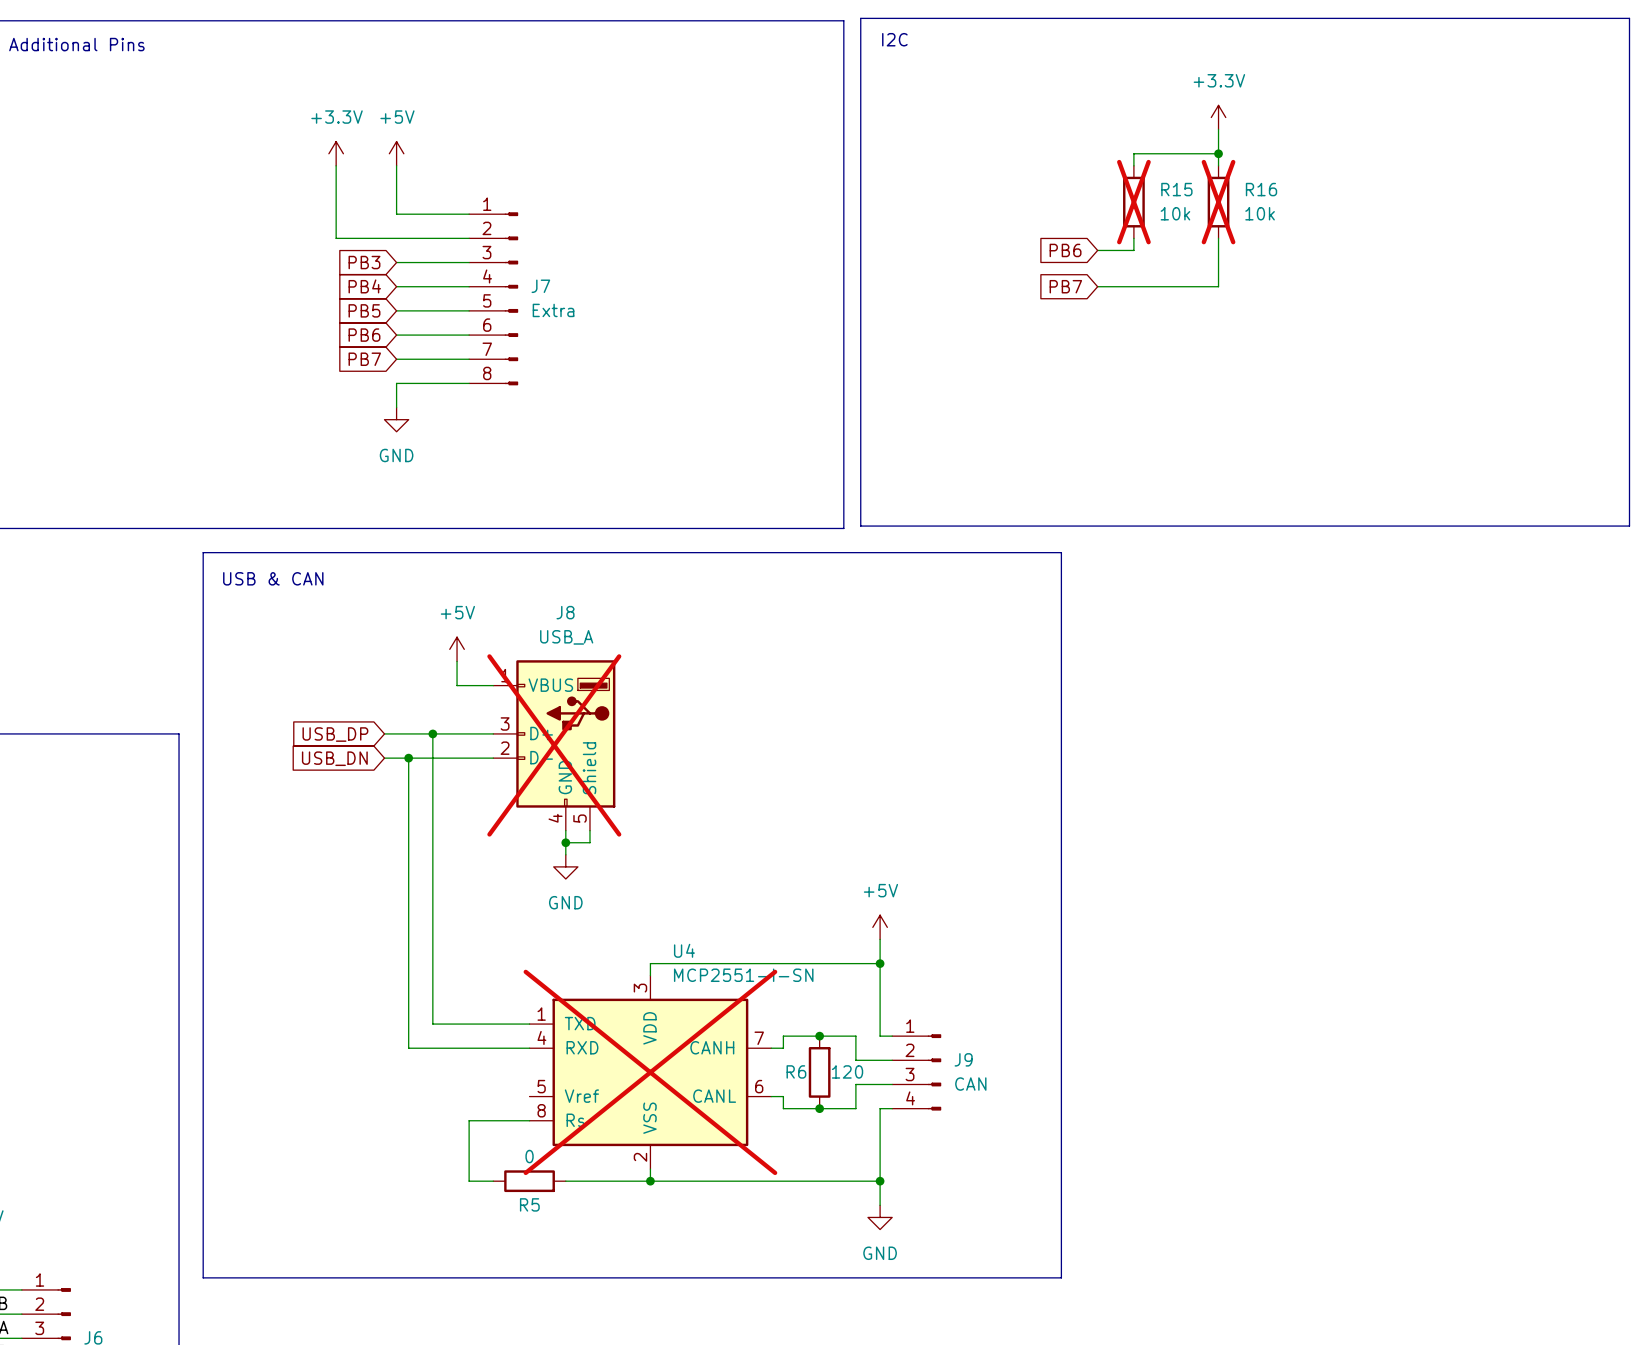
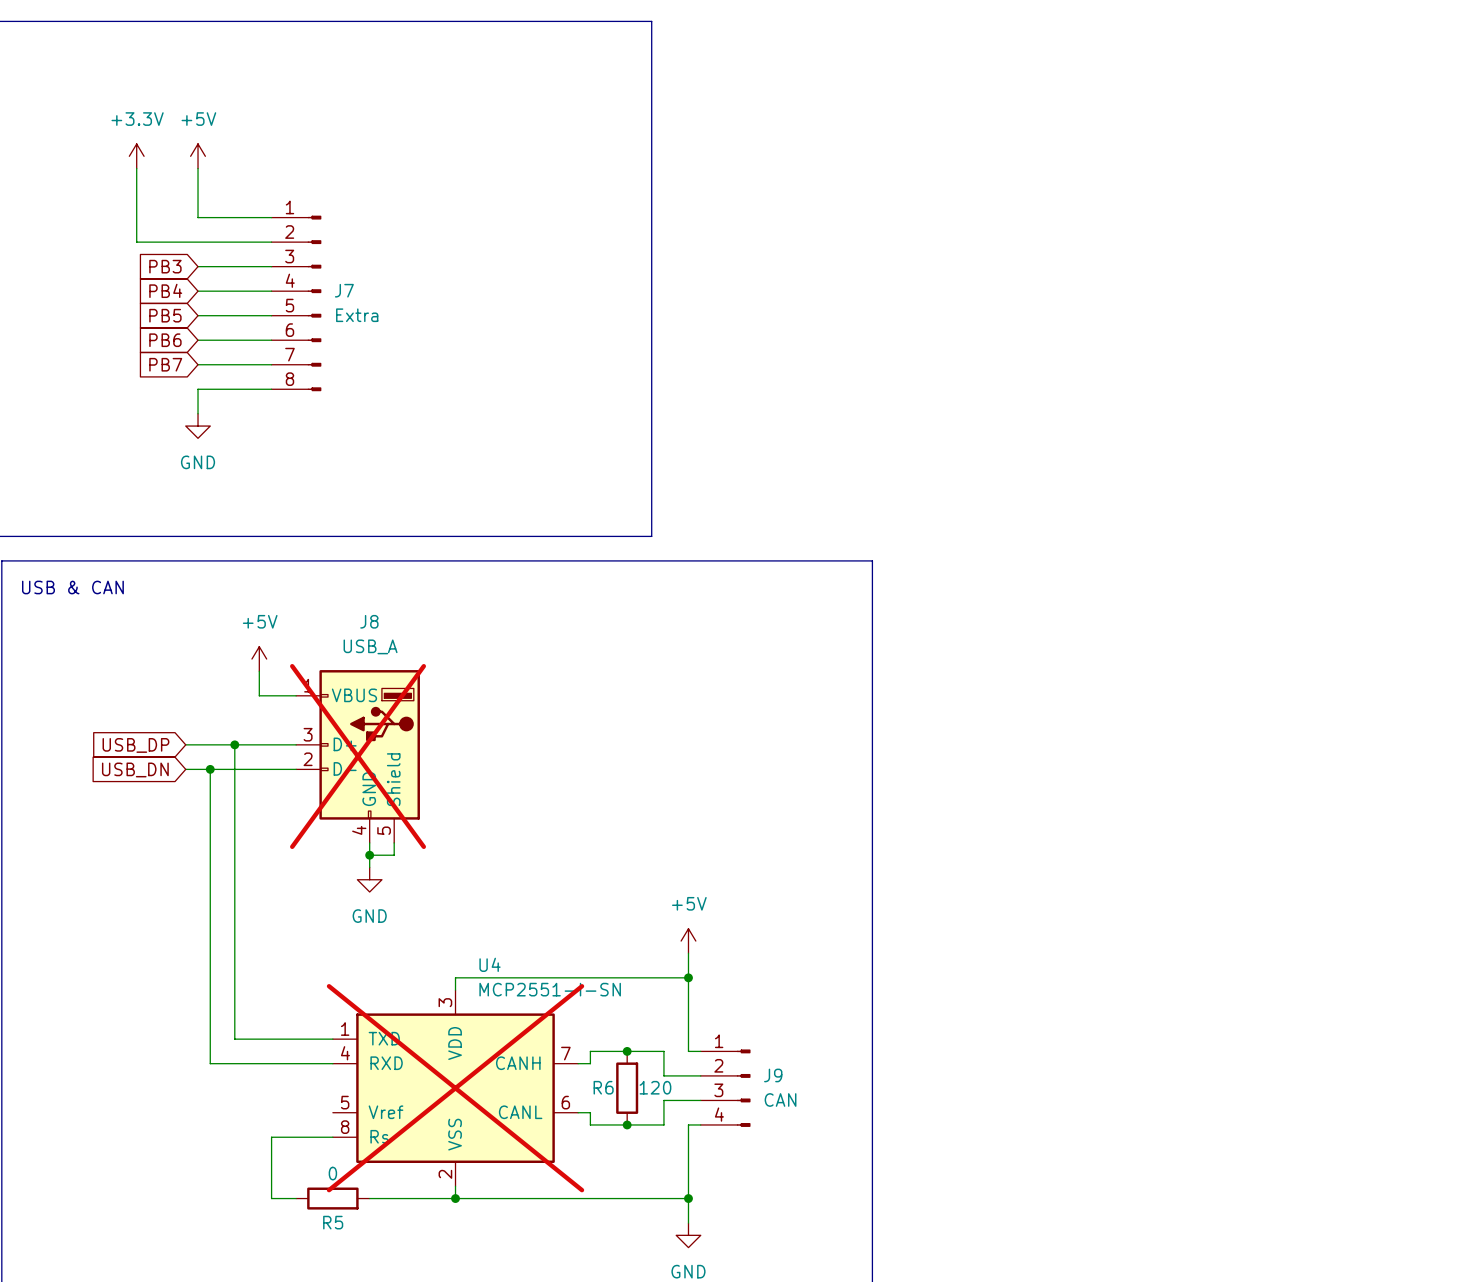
line: (860, 18) (1629, 18) (1629, 526) (860, 526) (860, 18) -> none
text: I2C (894, 39) -> none
power symbol: +3.3V (1218, 117) -> none
wire: (1218, 129) (1218, 165) -> none
wire: (1218, 153) (1133, 153) (1133, 165) -> none
junction: (1218, 153) -> none
R15: 10k (1133, 202) -> none
R16: 10k (1218, 202) -> none
wire: (1133, 238) (1133, 250) (1097, 250) -> none
wire: (1218, 238) (1218, 286) (1097, 286) -> none
global label: PB6 (1065, 250) -> none
global label: PB7 (1065, 286) -> none

